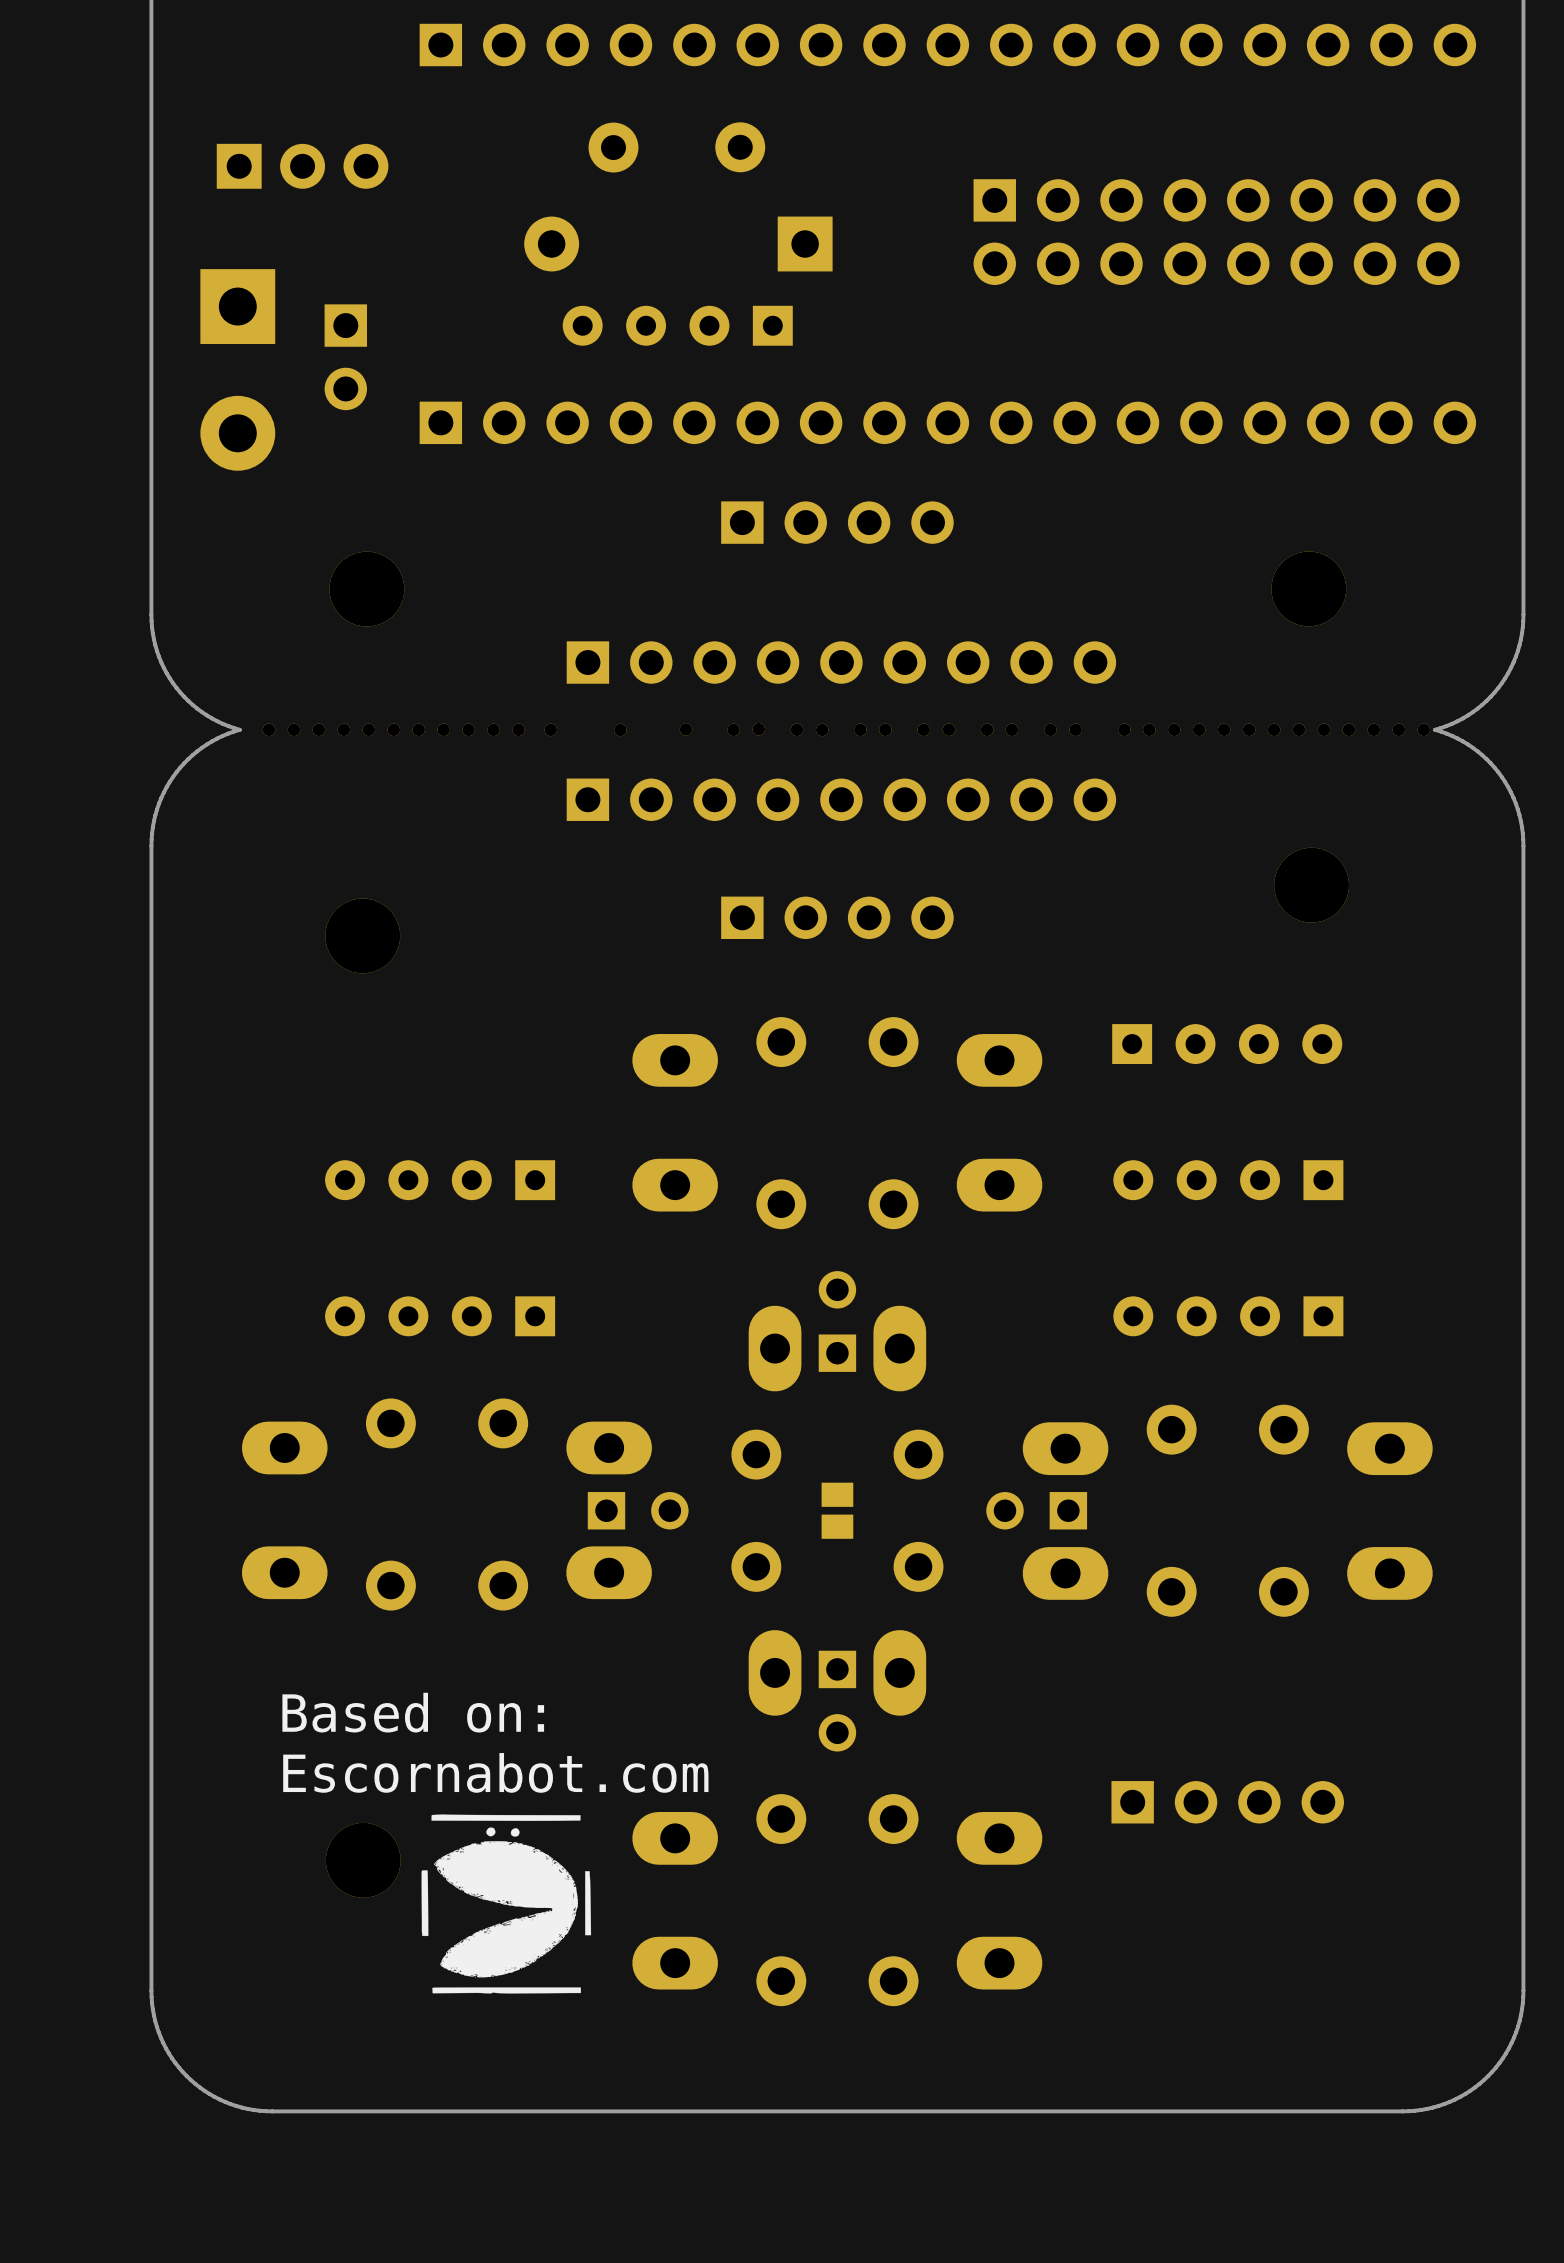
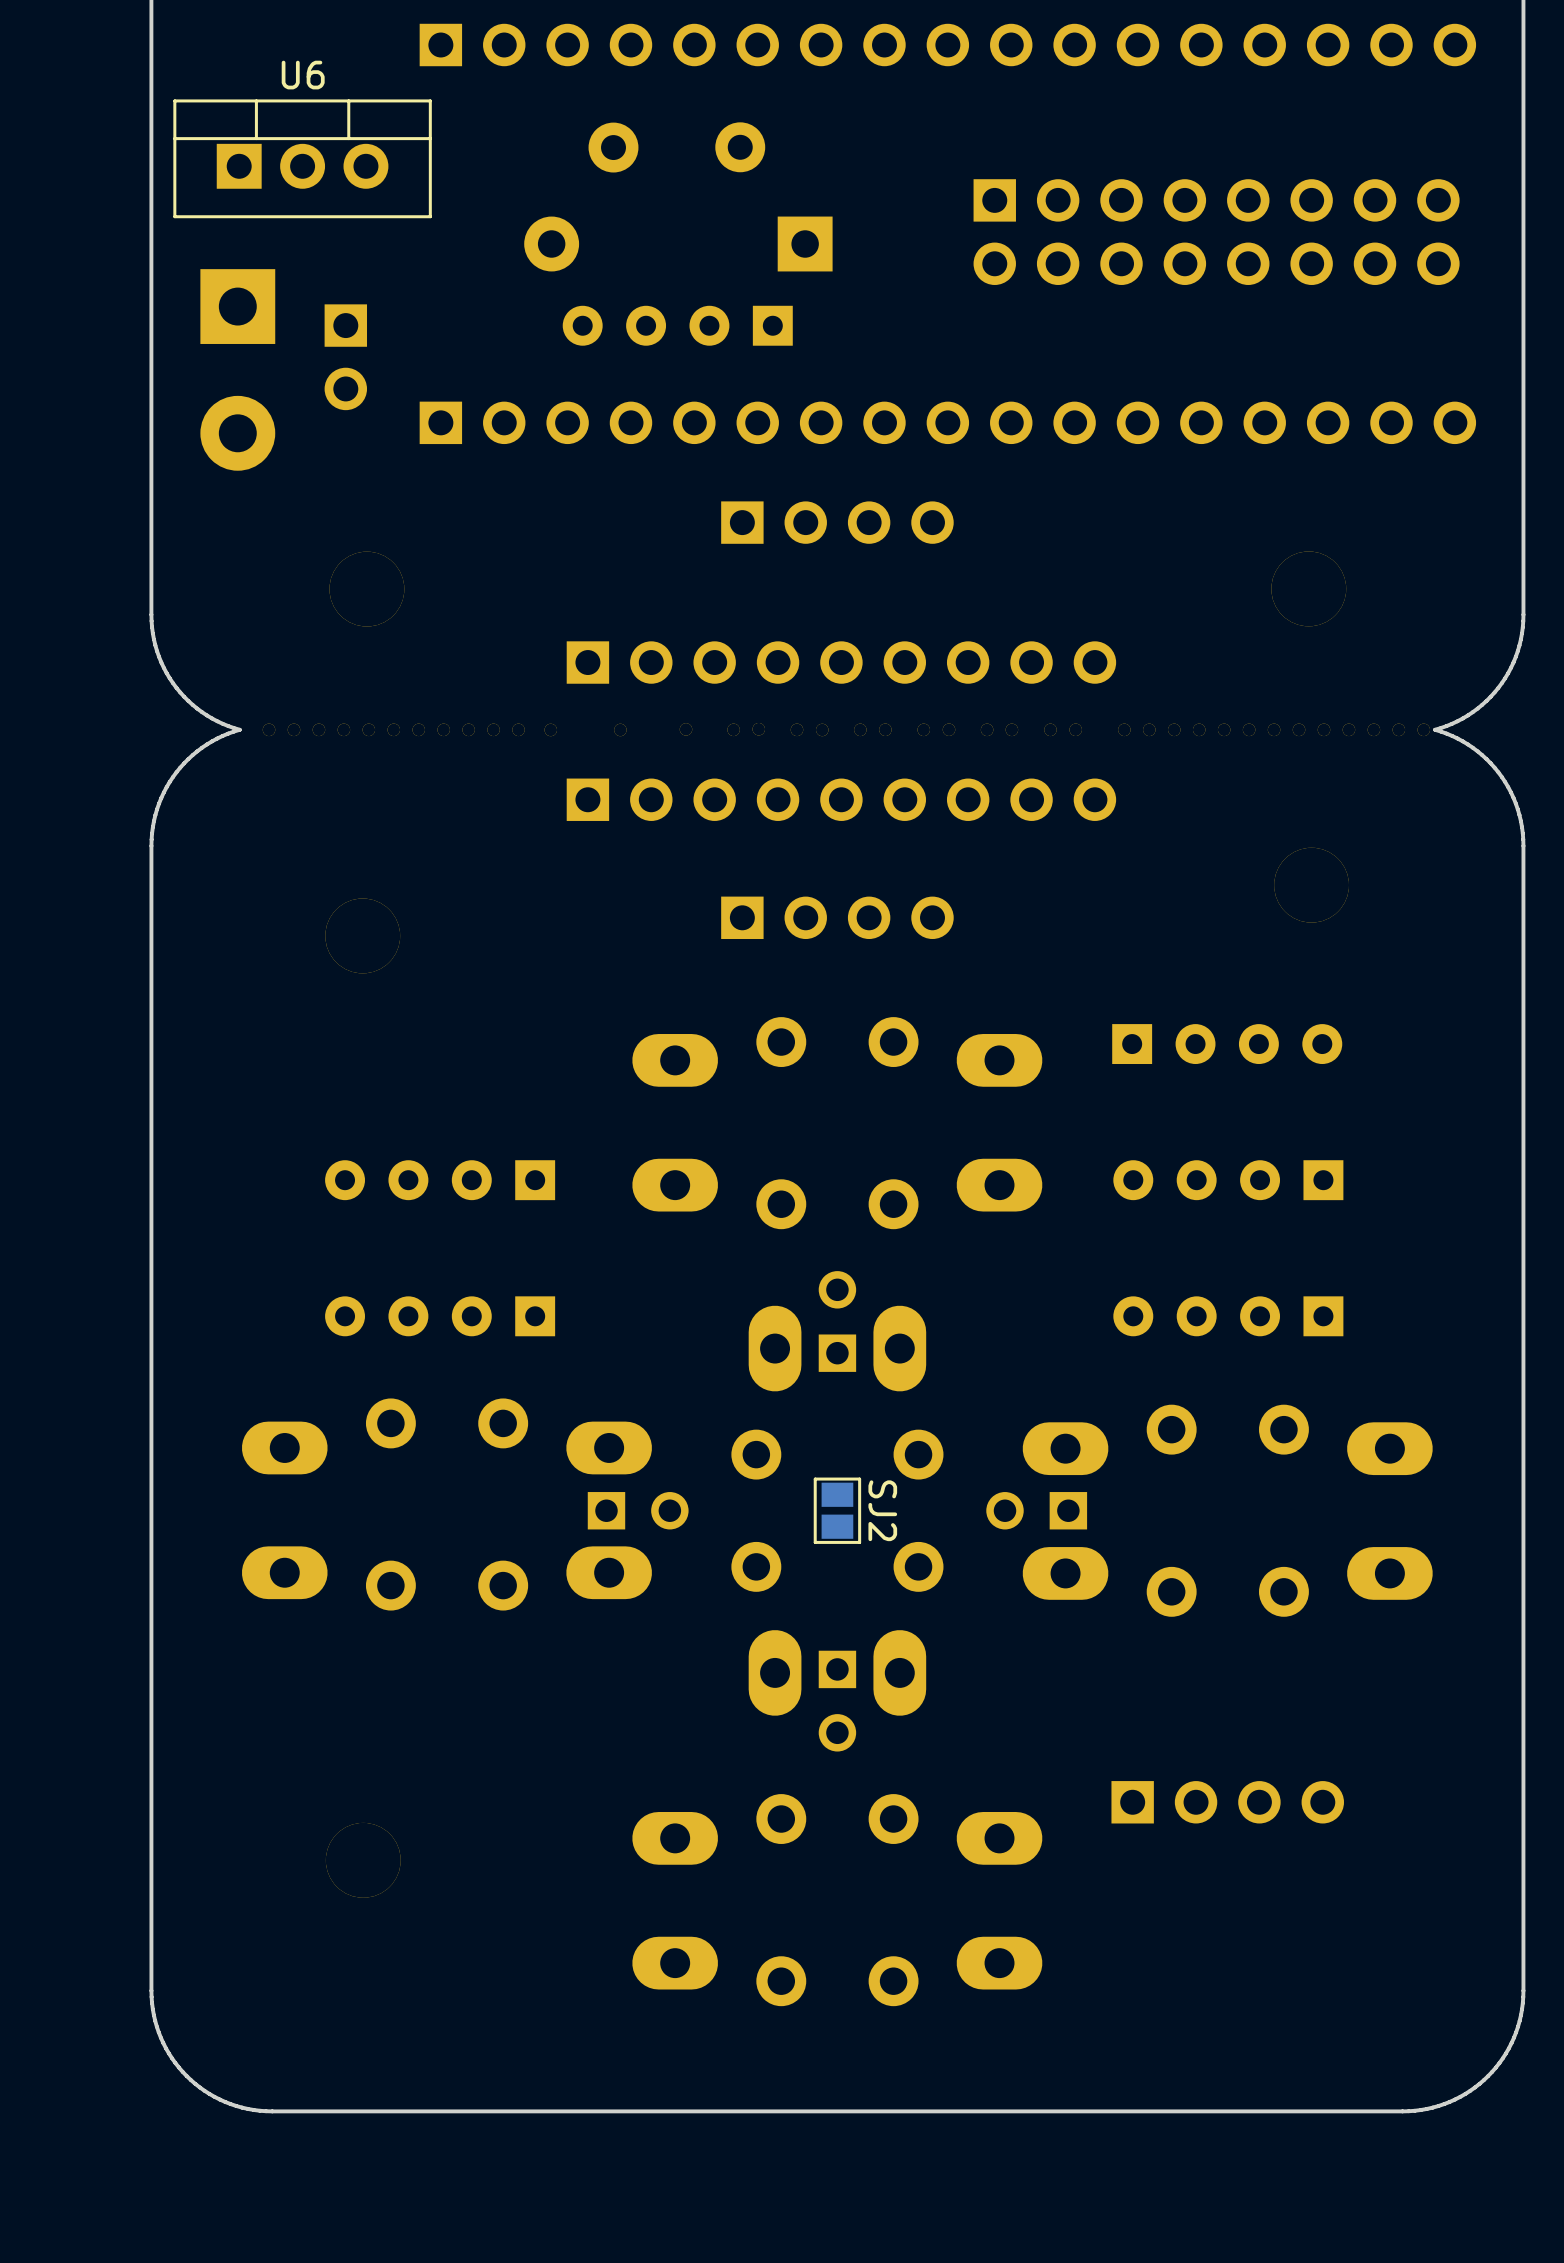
U6: none -> (302, 158)
part: (837, 1510) -> none
SJ2: none -> (837, 1510)
text: Based on: (413, 1712) -> none
text: Escornabot.com (495, 1772) -> none
drawing: [421, 1814, 592, 1994] -> none

